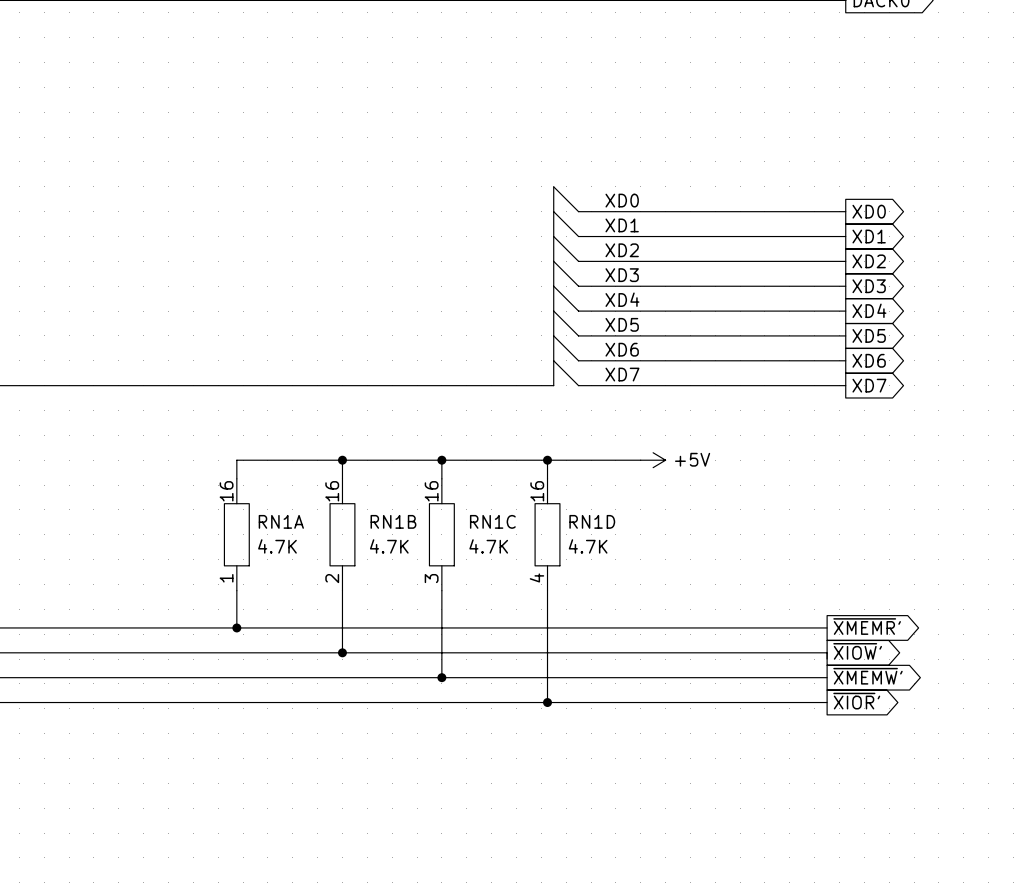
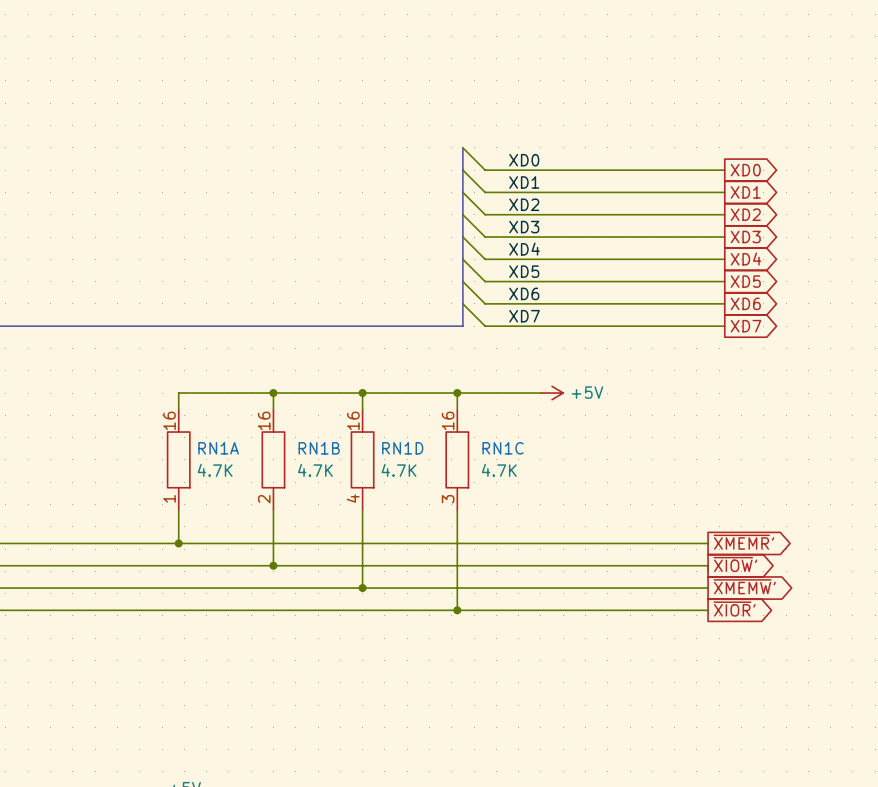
RN1C position: (441, 534) -> (457, 459)
RN1D position: (547, 534) -> (362, 459)

